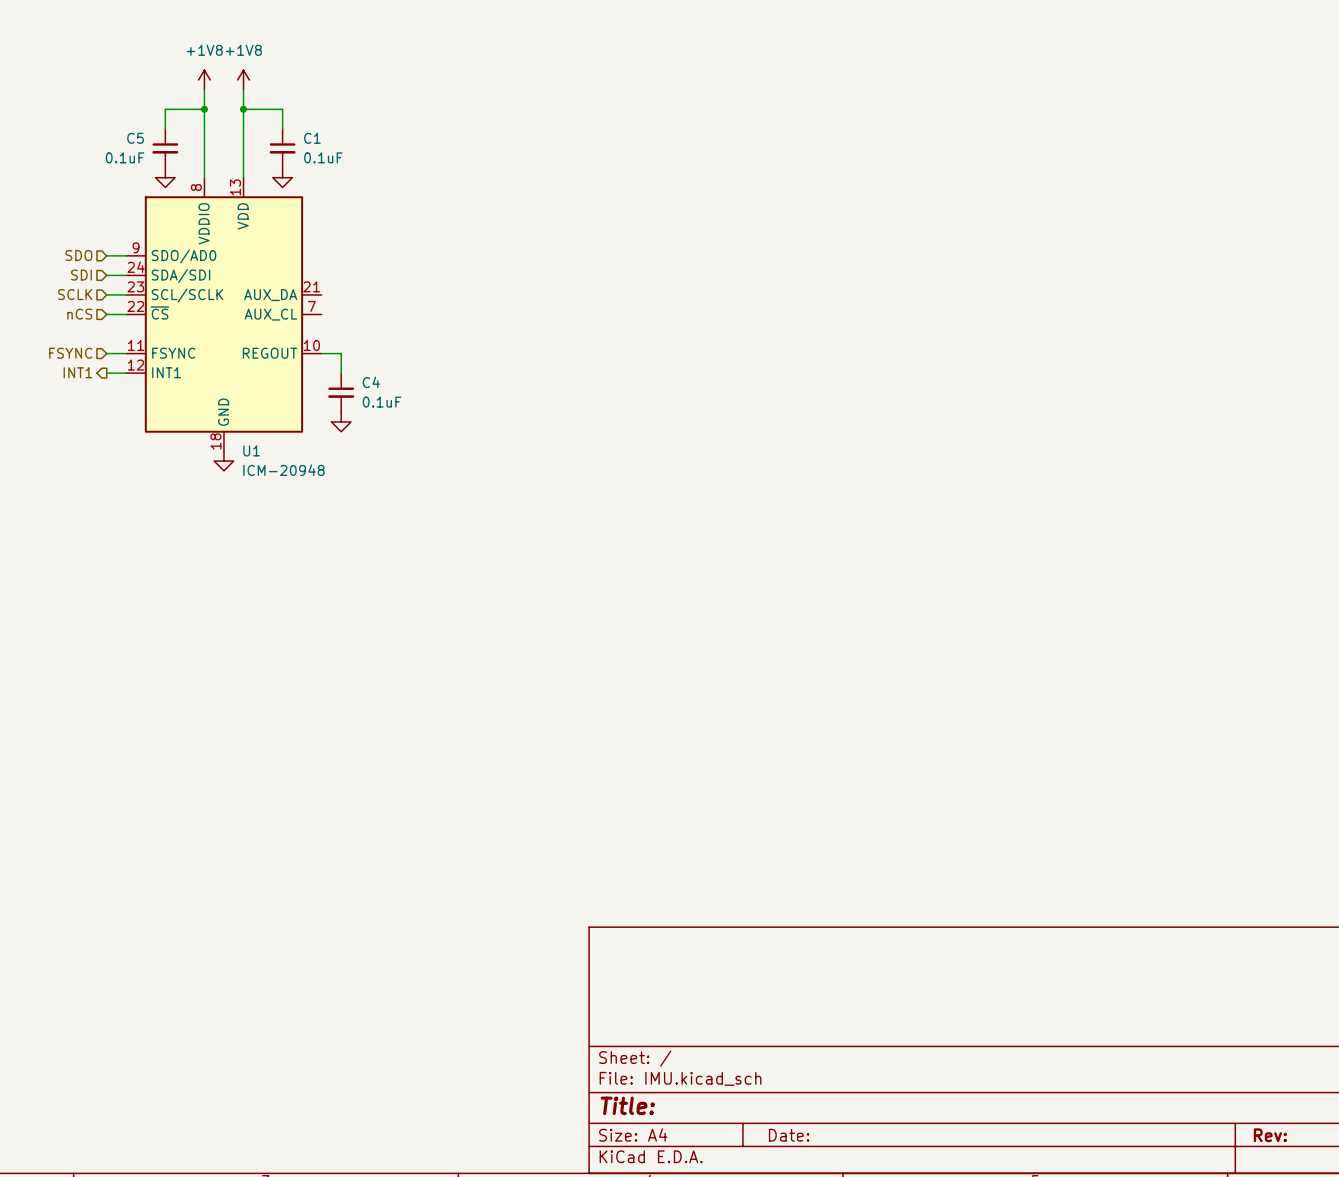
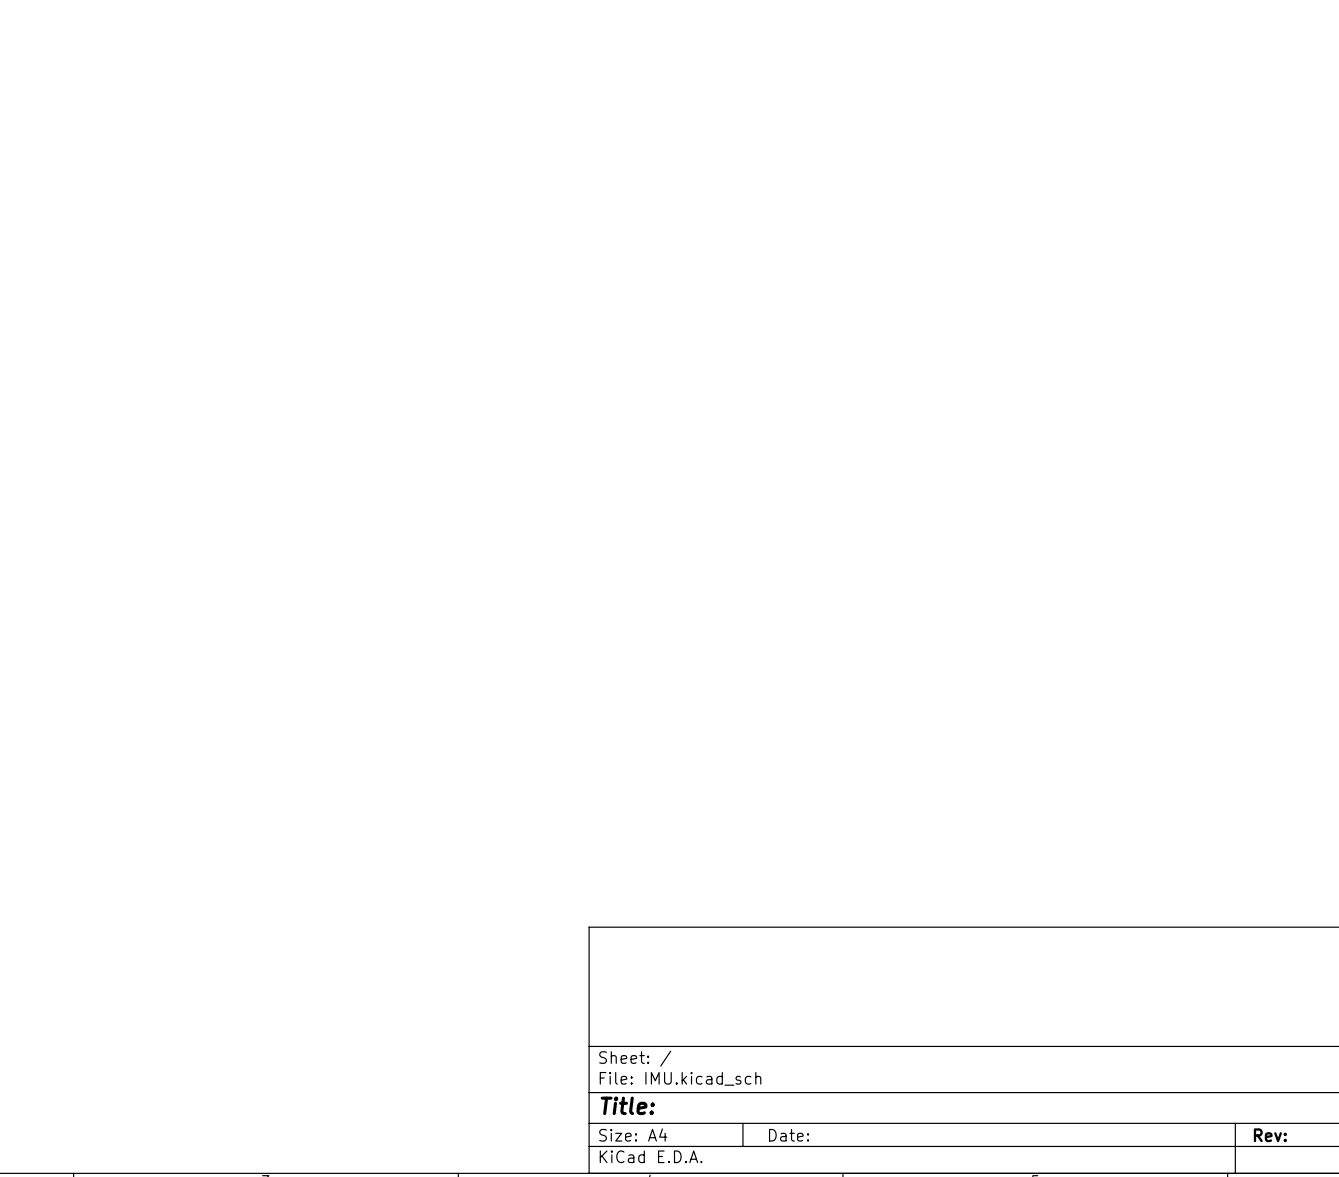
power symbol: +1V8 (204, 80) -> none
power symbol: +1V8 (243, 80) -> none
wire: (204, 89) (204, 177) -> none
wire: (243, 89) (243, 177) -> none
wire: (204, 109) (165, 109) (165, 128) -> none
junction: (204, 109) -> none
wire: (243, 109) (282, 109) (282, 128) -> none
junction: (243, 109) -> none
C5: 0.1uF (165, 148) -> none
C1: 0.1uF (282, 148) -> none
power symbol: (165, 177) -> none
power symbol: (282, 177) -> none
hierarchical label: SDO (78, 255) -> none
wire: (106, 255) (126, 255) -> none
hierarchical label: SDI (81, 275) -> none
wire: (106, 275) (126, 275) -> none
hierarchical label: SCLK (75, 294) -> none
wire: (106, 294) (126, 294) -> none
hierarchical label: nCS (79, 314) -> none
wire: (106, 314) (126, 314) -> none
U1: ICM-20948 (223, 314) -> none
hierarchical label: FSYNC (70, 353) -> none
wire: (106, 353) (126, 353) -> none
wire: (321, 353) (341, 353) (341, 373) -> none
hierarchical label: INT1 (77, 372) -> none
wire: (106, 373) (126, 373) -> none
C4: 0.1uF (341, 392) -> none
power symbol: (341, 421) -> none
power symbol: (223, 461) -> none

